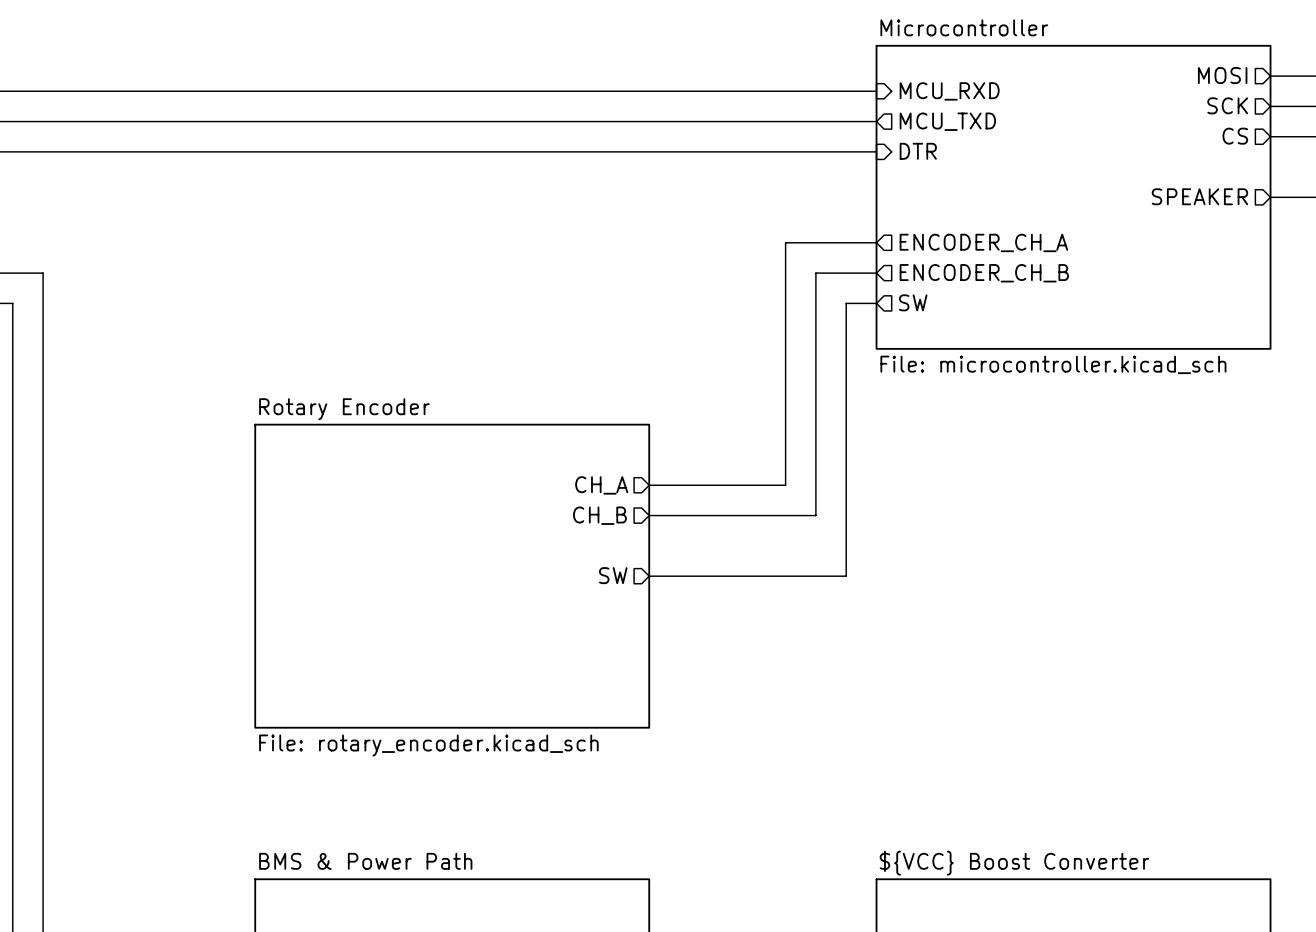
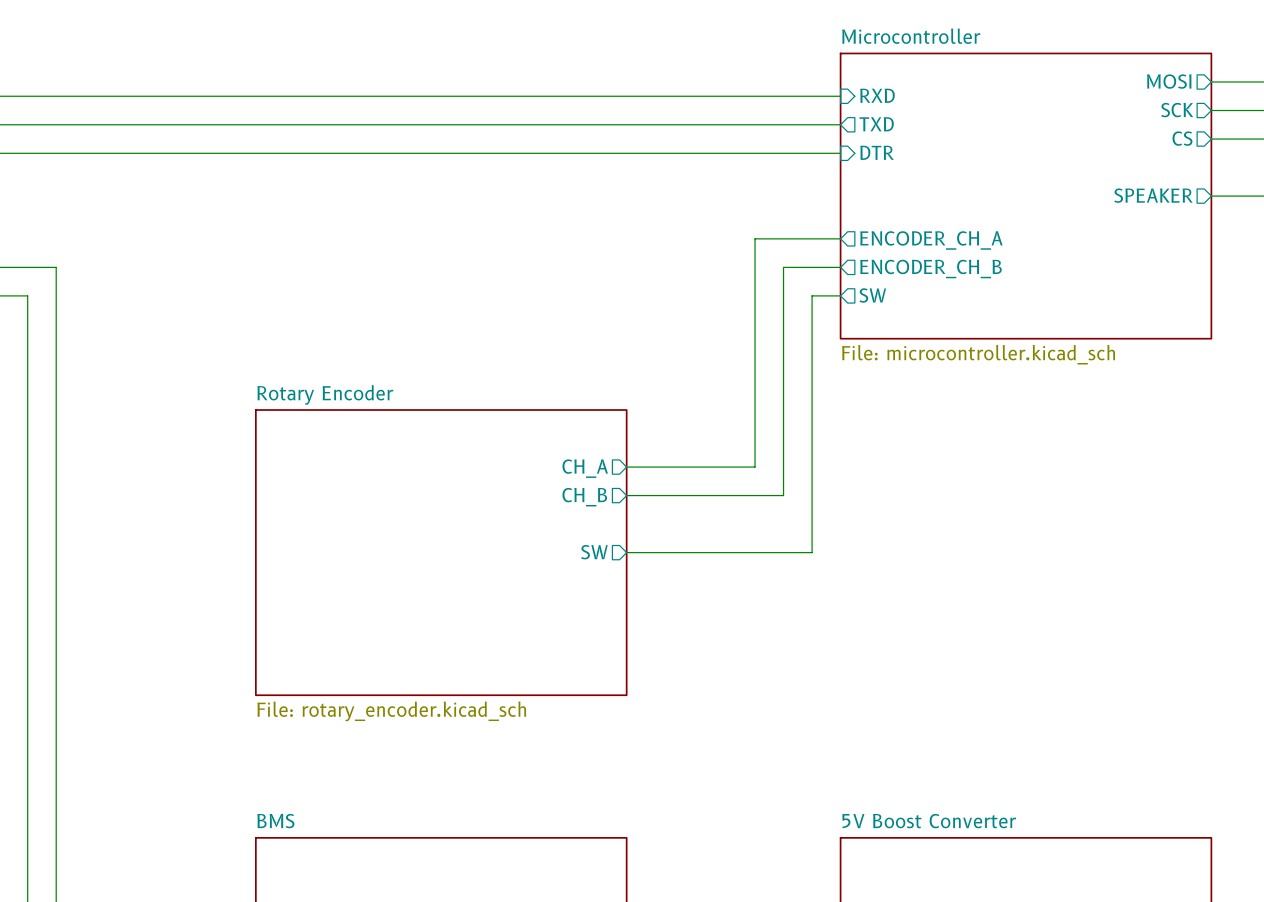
sheet pin: MCU_RXD (949, 91) -> RXD (877, 95)
sheet pin: MCU_TXD (947, 121) -> TXD (876, 124)
sheet BMS & Power Path name: BMS & Power Path (365, 861) -> BMS (275, 821)
sheet ${VCC} Boost Converter name: ${VCC} Boost Converter (1014, 863) -> 5V Boost Converter (929, 821)

